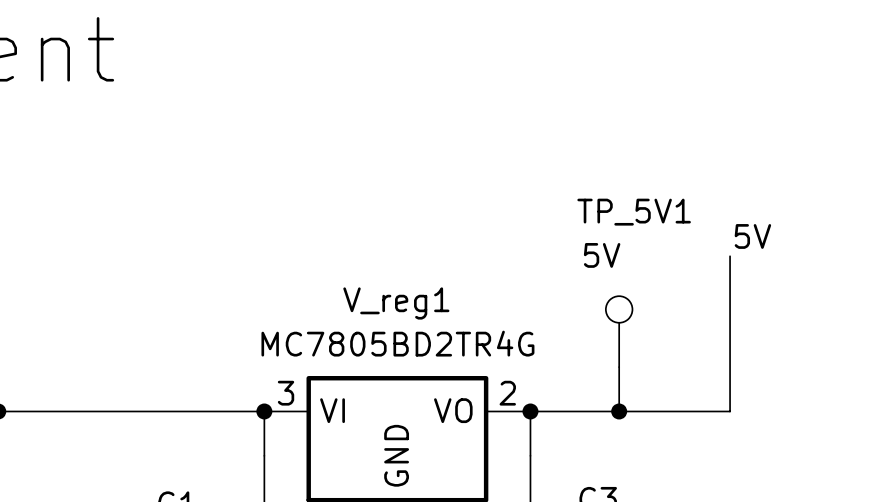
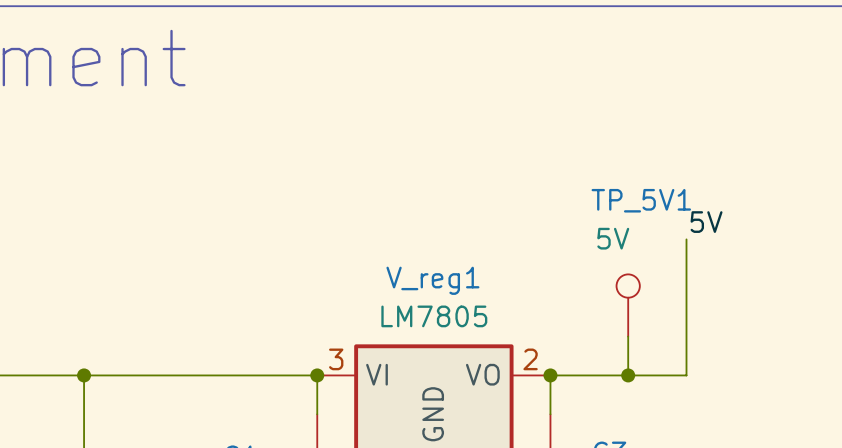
label position: 5V (752, 236) -> 5V (706, 222)
wire: (730, 256) (730, 411) (685, 411) -> (686, 239) (686, 375)
V_reg1 value: MC7805BD2TR4G (397, 343) -> LM7805 (434, 316)

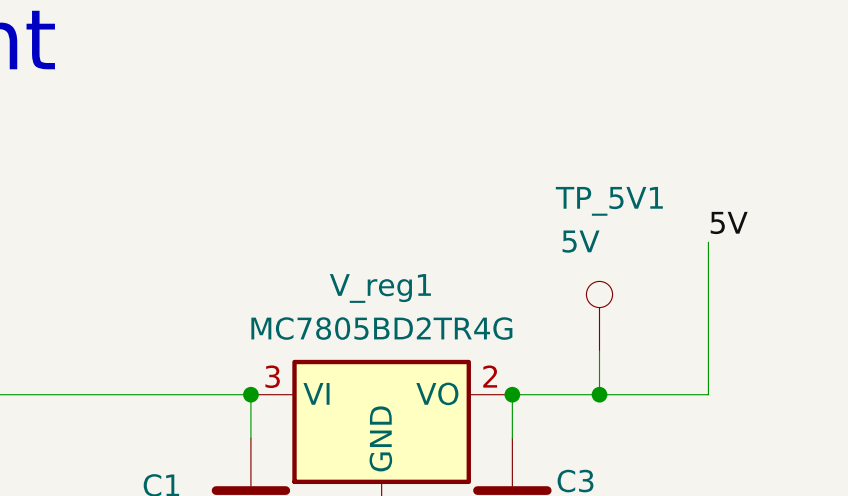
label position: 5V (706, 222) -> 5V (729, 222)
wire: (686, 239) (686, 375) -> (708, 242) (708, 394) (664, 394)
V_reg1 value: LM7805 (434, 316) -> MC7805BD2TR4G (381, 328)

